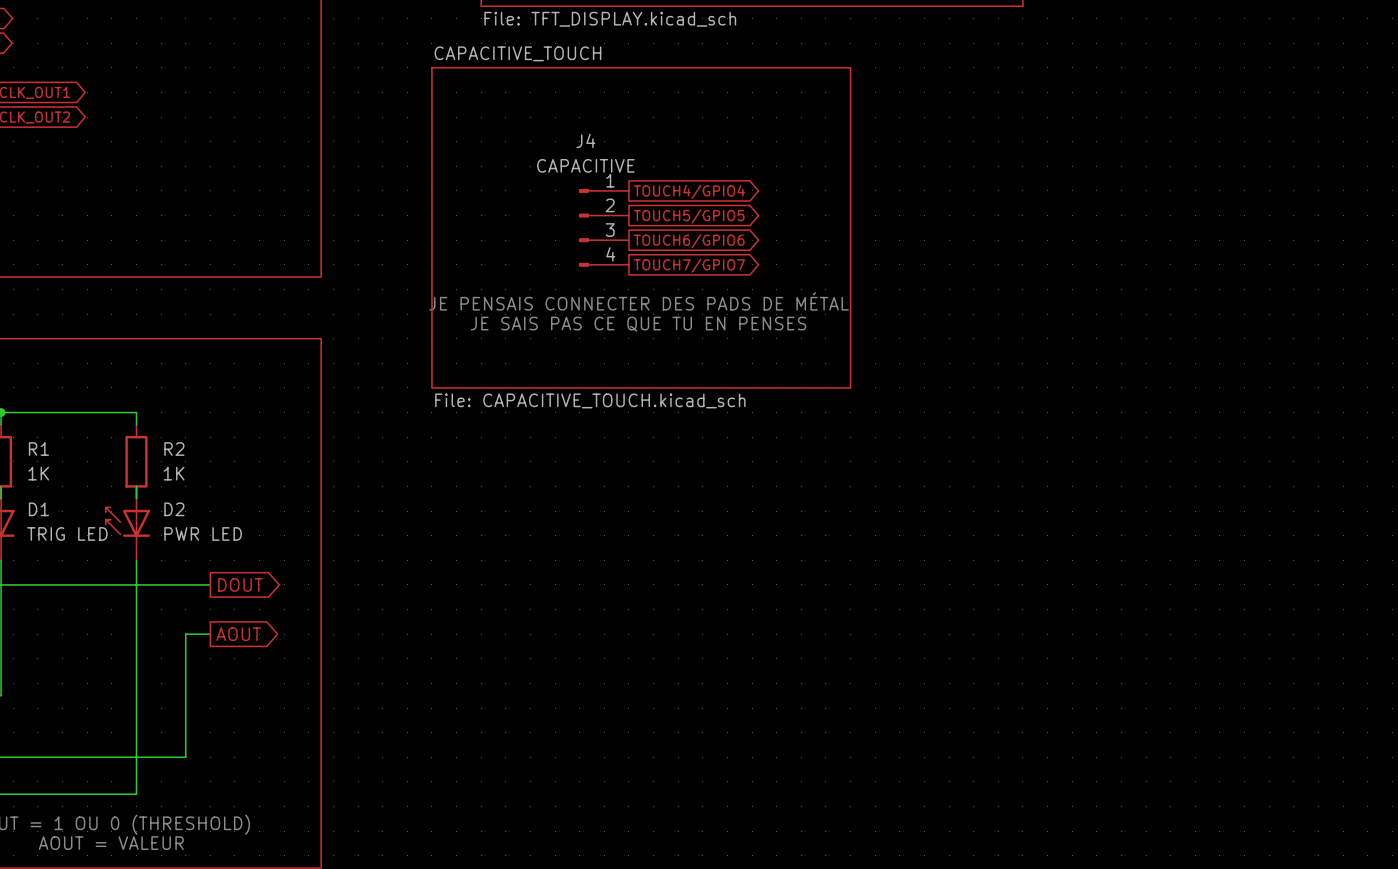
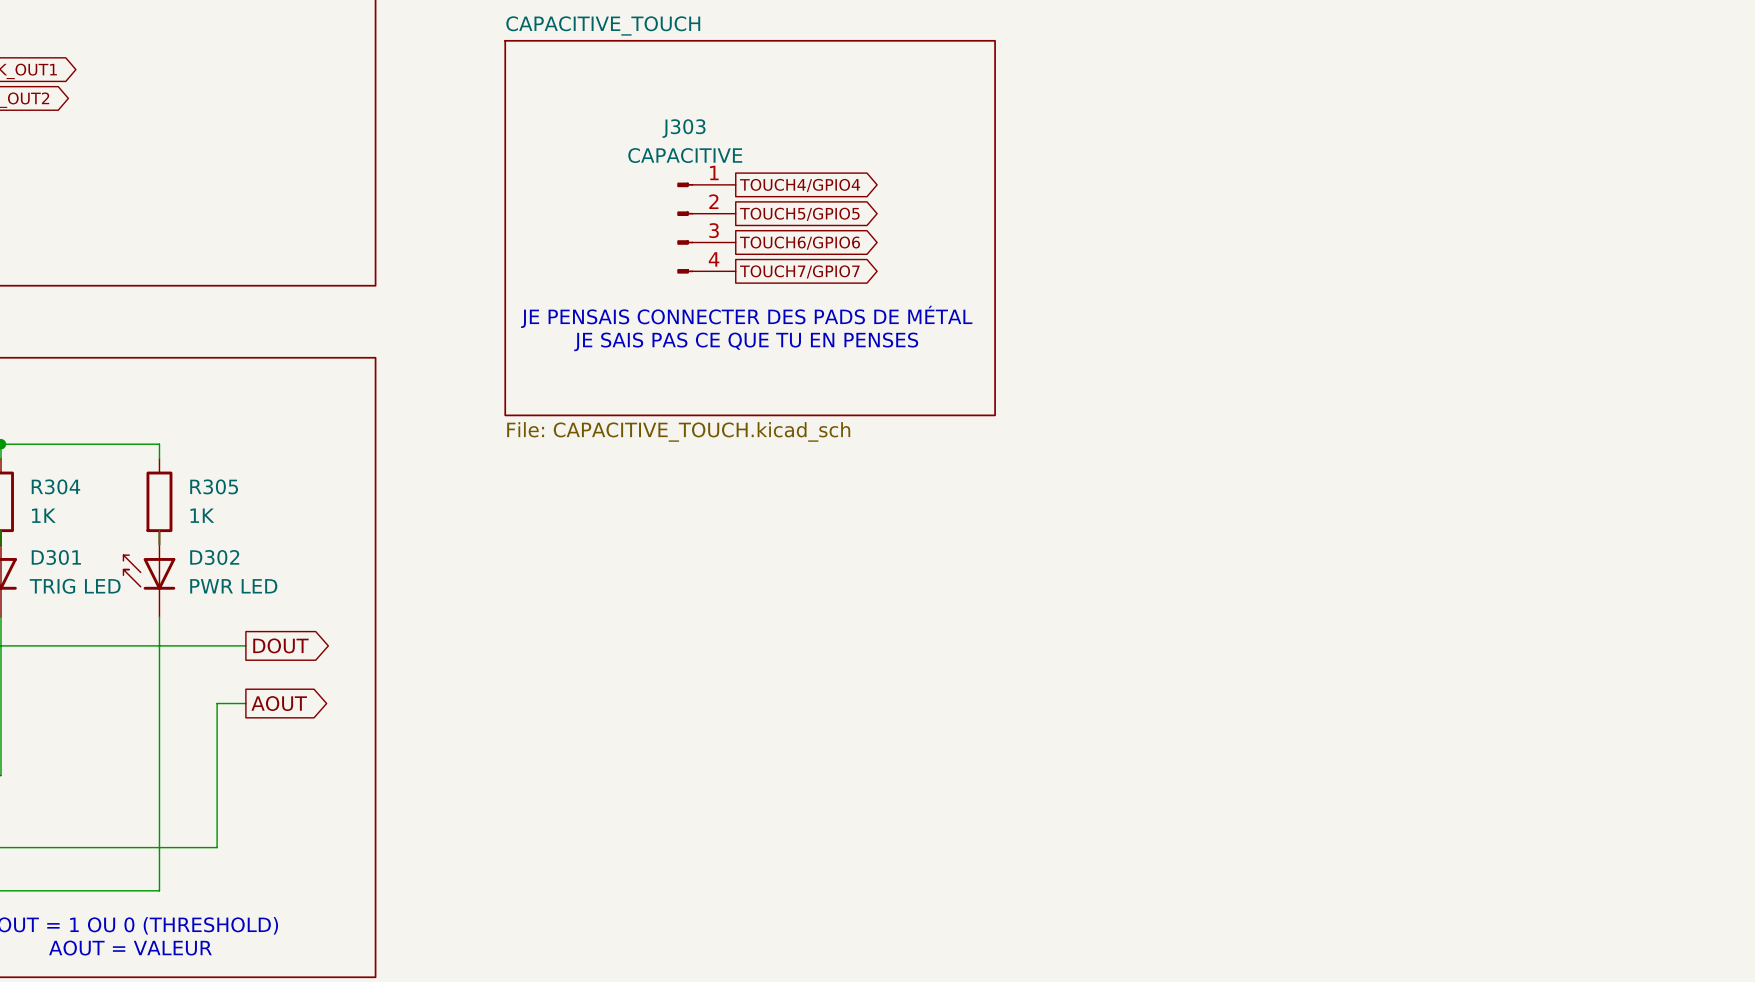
J4 name: J4 (585, 140) -> J303 (684, 128)
R1 name: R1 (38, 449) -> R304 (55, 486)
R2 name: R2 (174, 449) -> R305 (214, 486)
D1 name: D1 (38, 509) -> D301 (56, 557)
D2 name: D2 (174, 509) -> D302 (214, 557)

